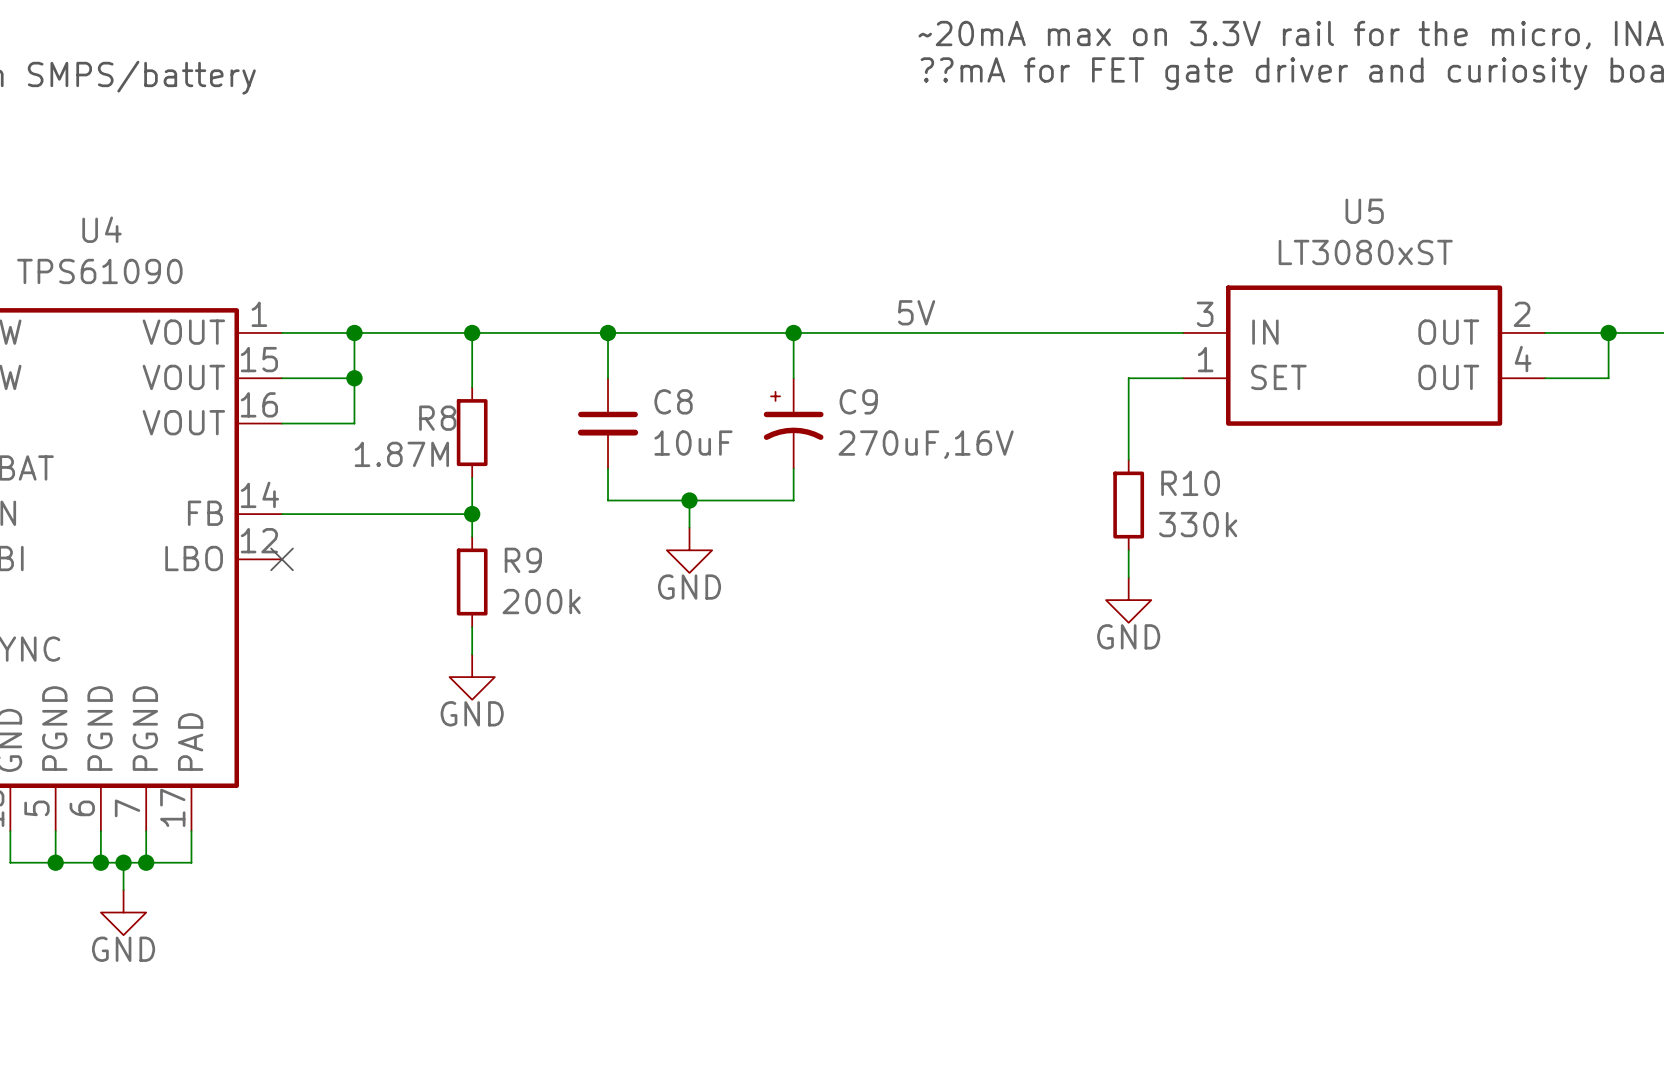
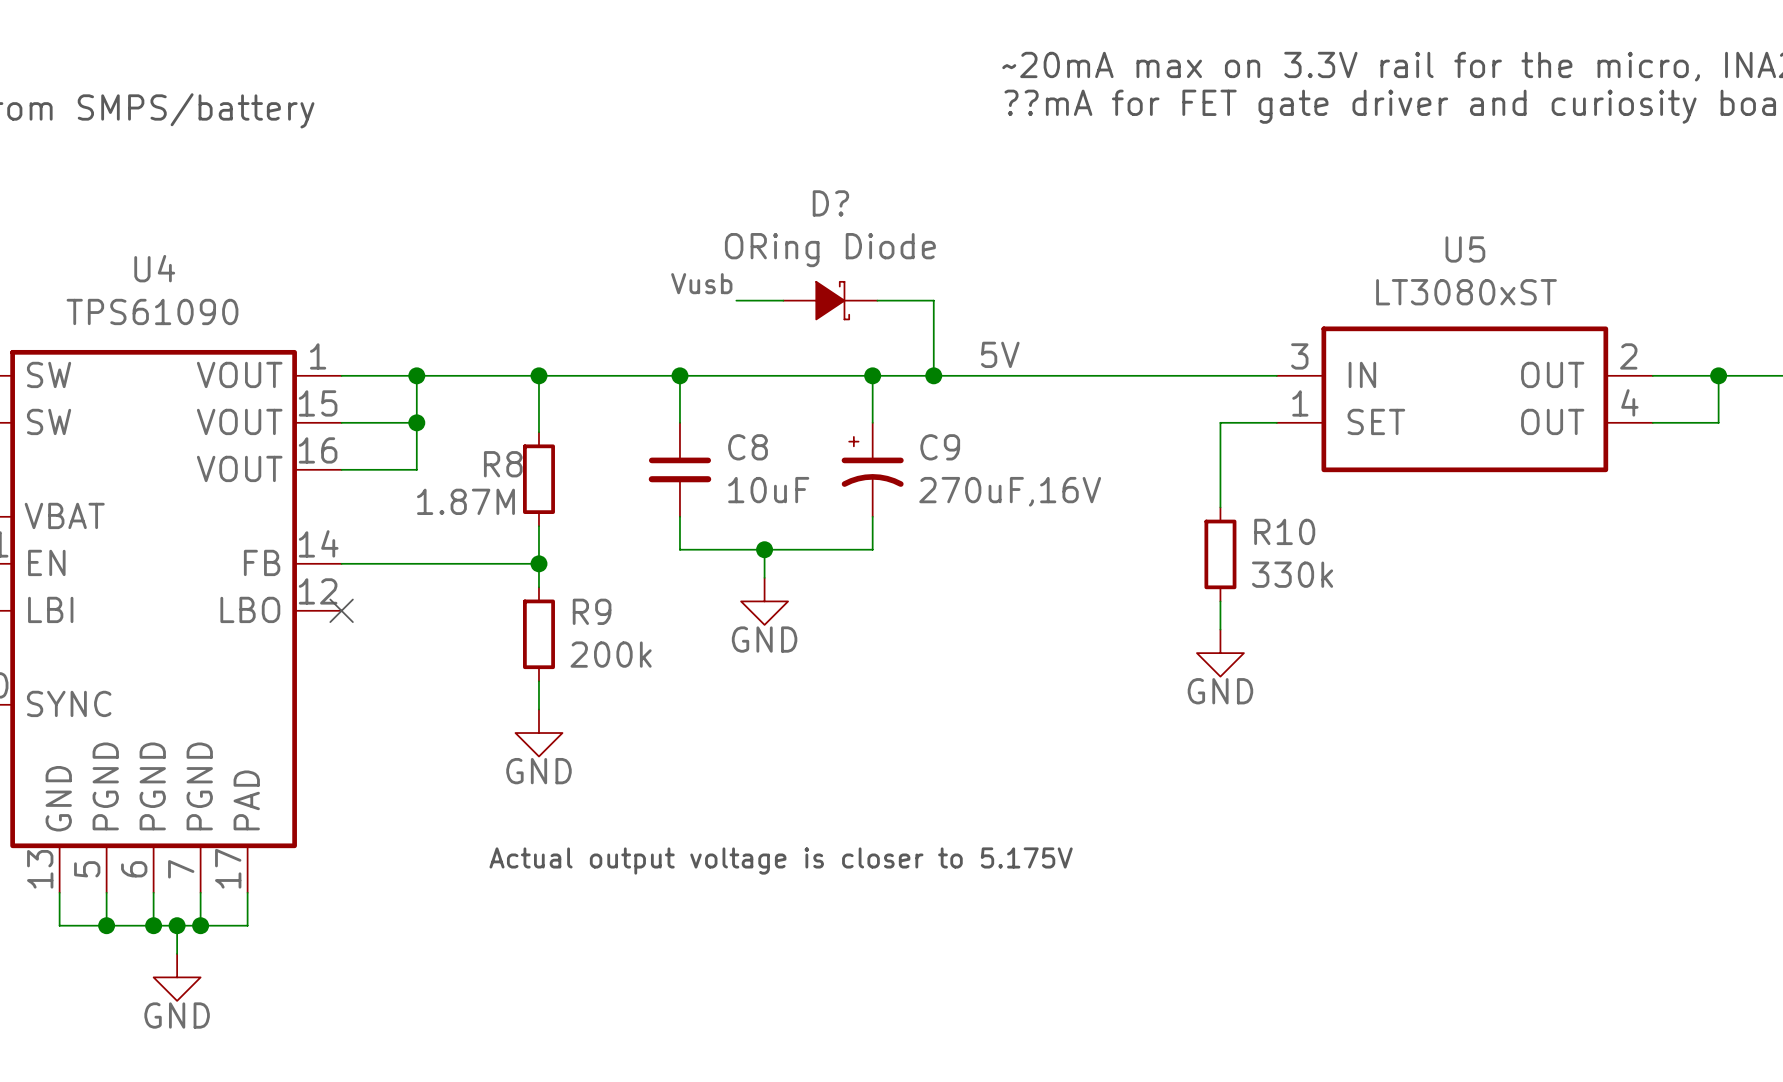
label: none -> Vusb (701, 283)
wire: none -> (736, 300) (783, 300)
D?: none -> ORing Diode (830, 300)
wire: none -> (877, 300) (933, 300) (933, 375)
junction: none -> (933, 375)
text: none -> Actual output voltage is closer to 5.175V (781, 861)

